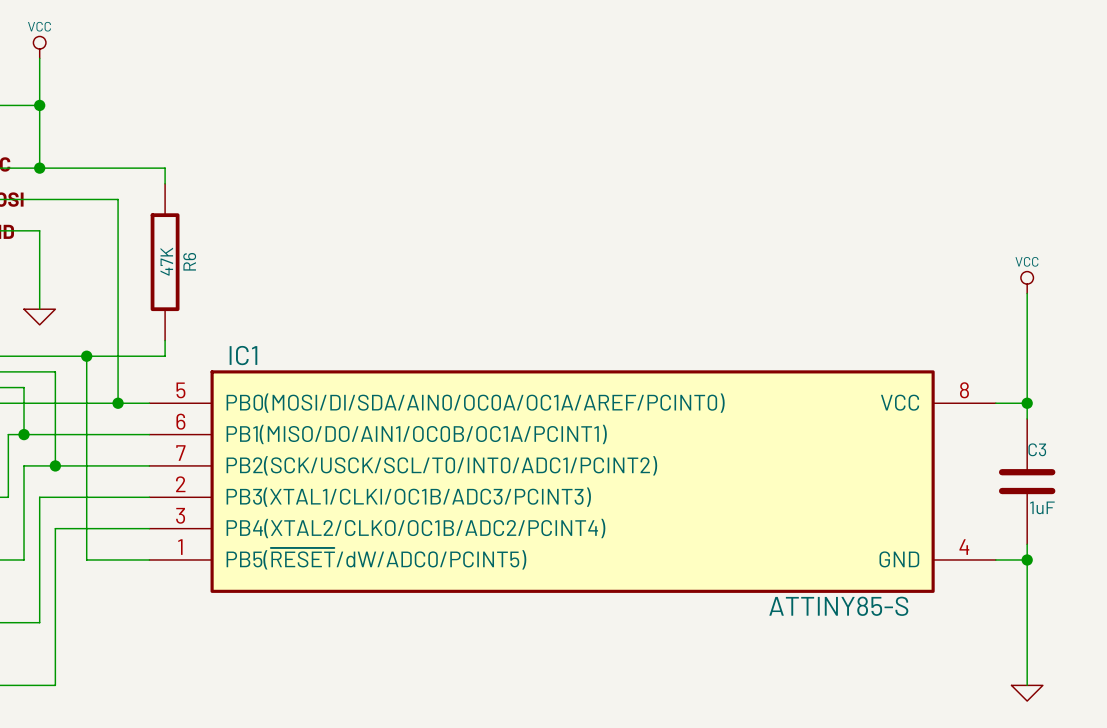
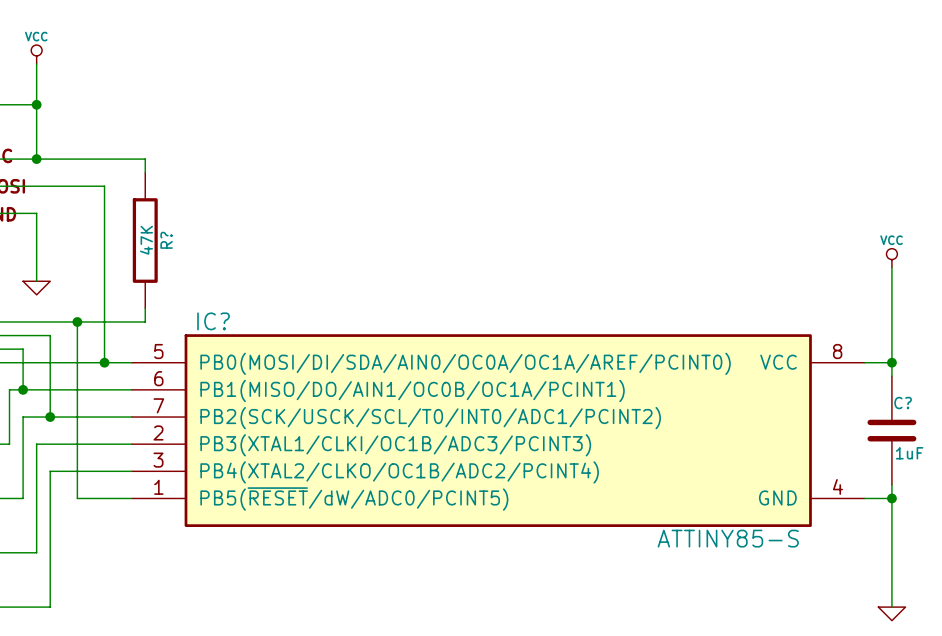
R6 name: R6 (189, 261) -> R? (166, 240)
IC1 name: IC1 (243, 355) -> IC? (213, 321)
C3 name: C3 (1037, 449) -> C? (903, 403)

